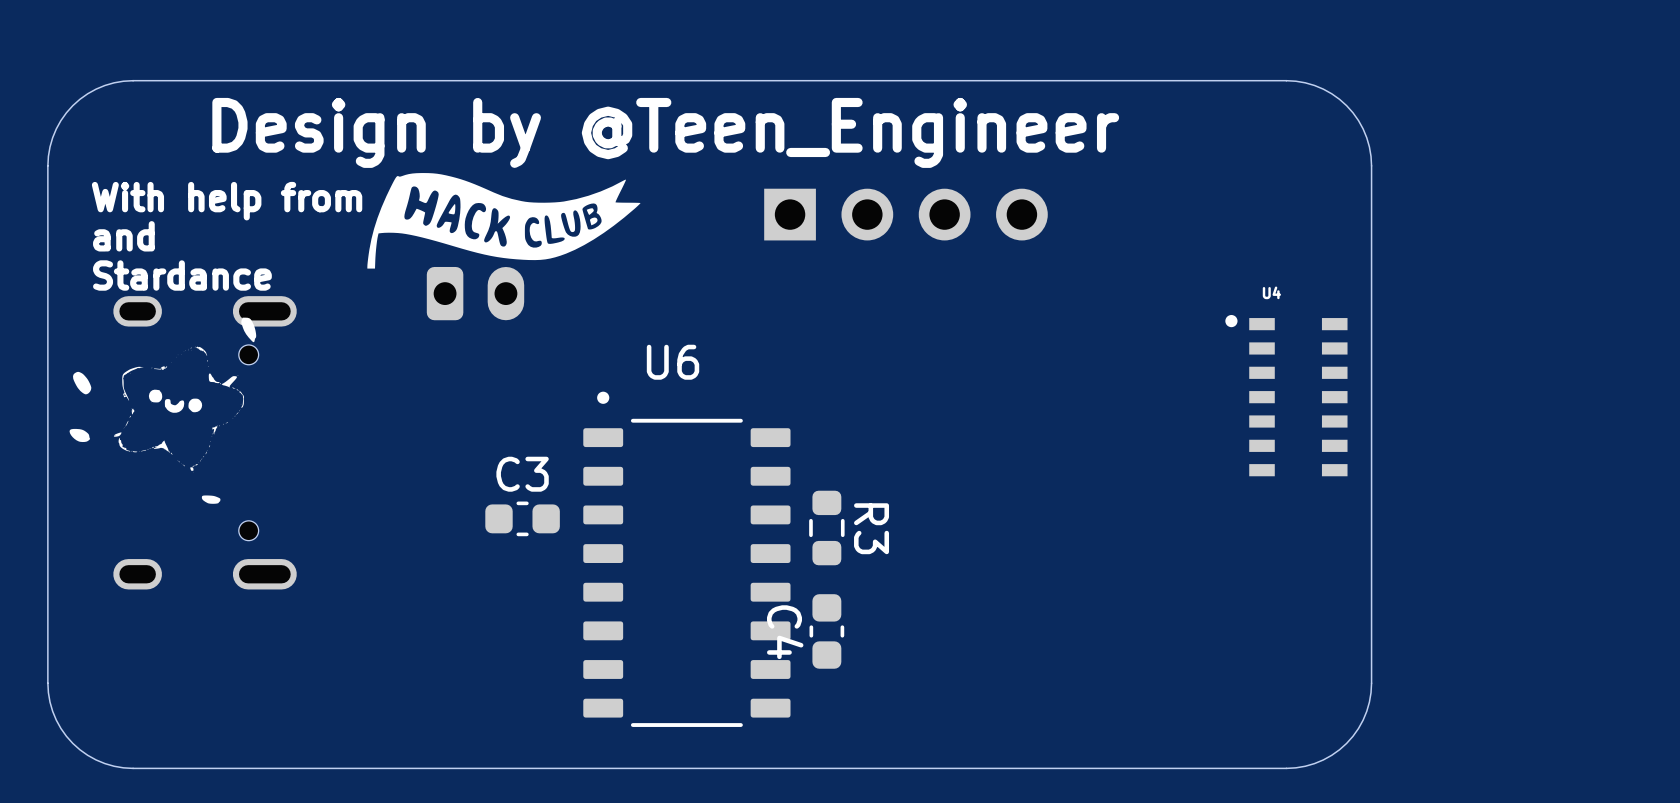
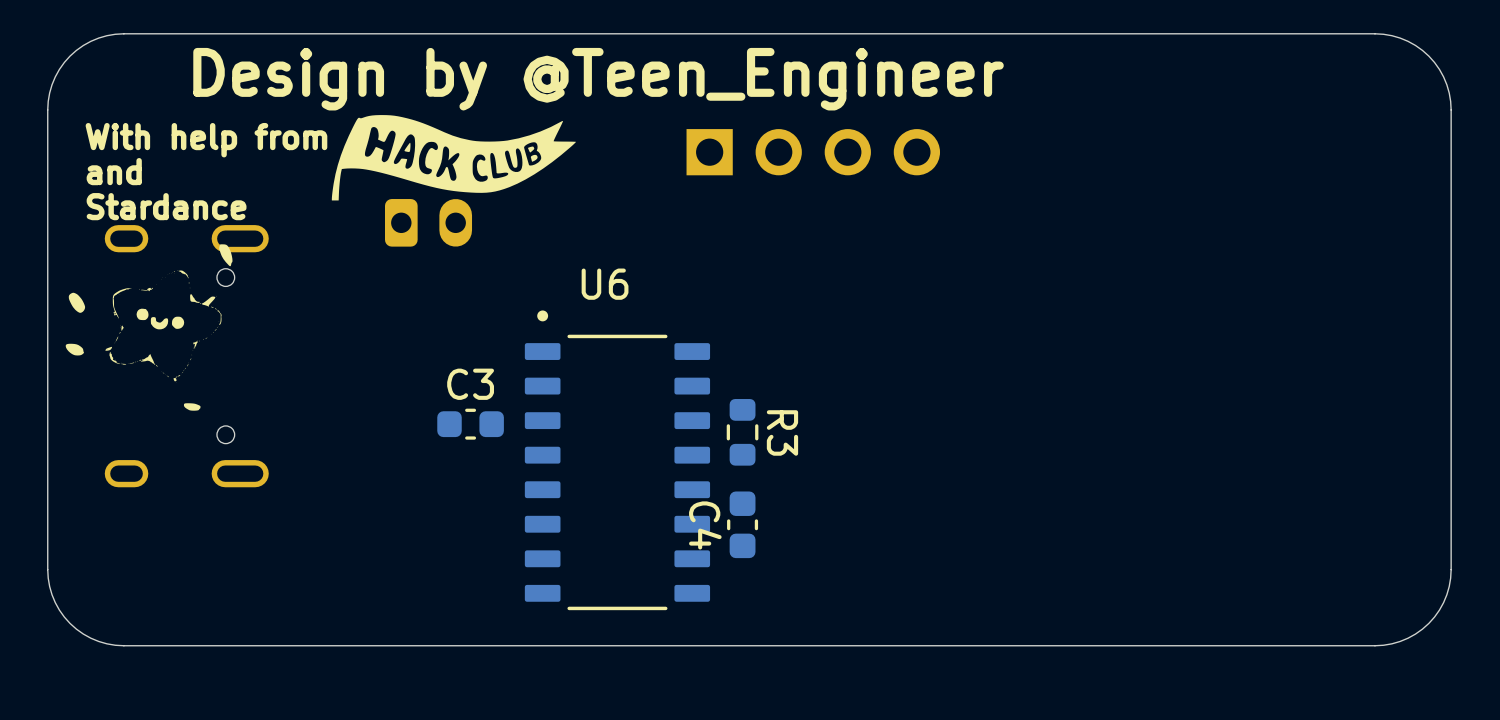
board edge: (1286, 80) (133, 80) (114, 82) (96, 89) (72, 105) (60, 120) (52, 137) (48, 156) (47, 683) (50, 702) (56, 720) (72, 743) (87, 755) (104, 763) (133, 768) (1286, 768) (1305, 766) (1323, 759) (1339, 749) (1352, 736) (1363, 720) (1371, 692) (1371, 165) (1369, 146) (1363, 128) (1346, 105) (1323, 89) (1305, 82) (1286, 80) -> (1374, 33) (1400, 38) (1415, 45) (1428, 56) (1443, 76) (1449, 93) (1451, 109) (1450, 578) (1443, 602) (1434, 617) (1422, 629) (1408, 638) (1391, 643) (1374, 645) (123, 645) (98, 641) (83, 634) (70, 623) (55, 602) (49, 586) (47, 569) (48, 101) (52, 84) (59, 69) (76, 50) (90, 41) (106, 35) (123, 33) (1374, 33)
U4: (1286, 395) -> none

